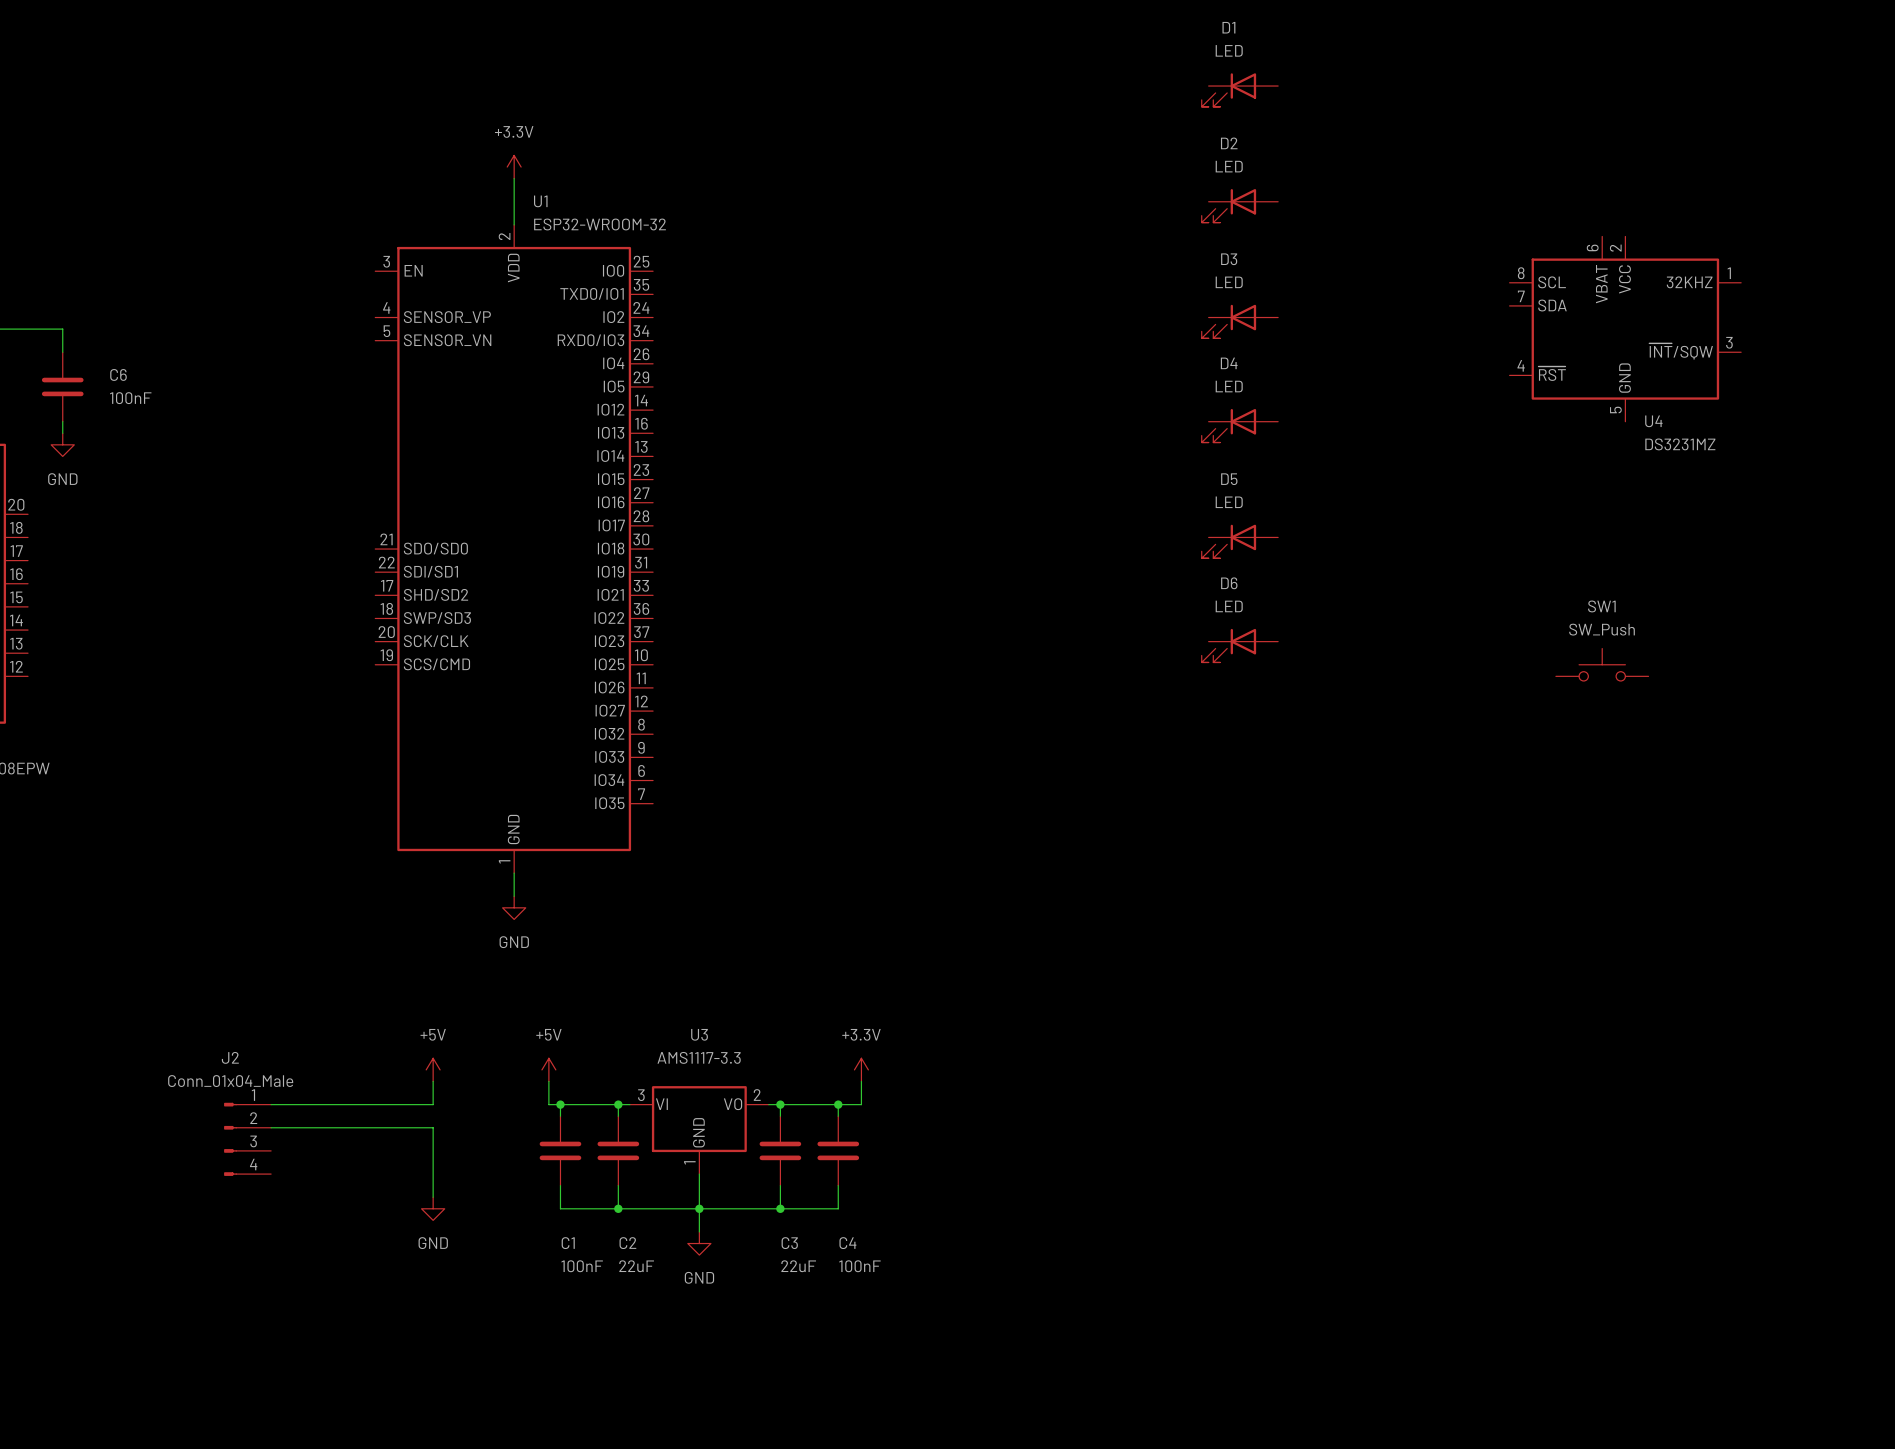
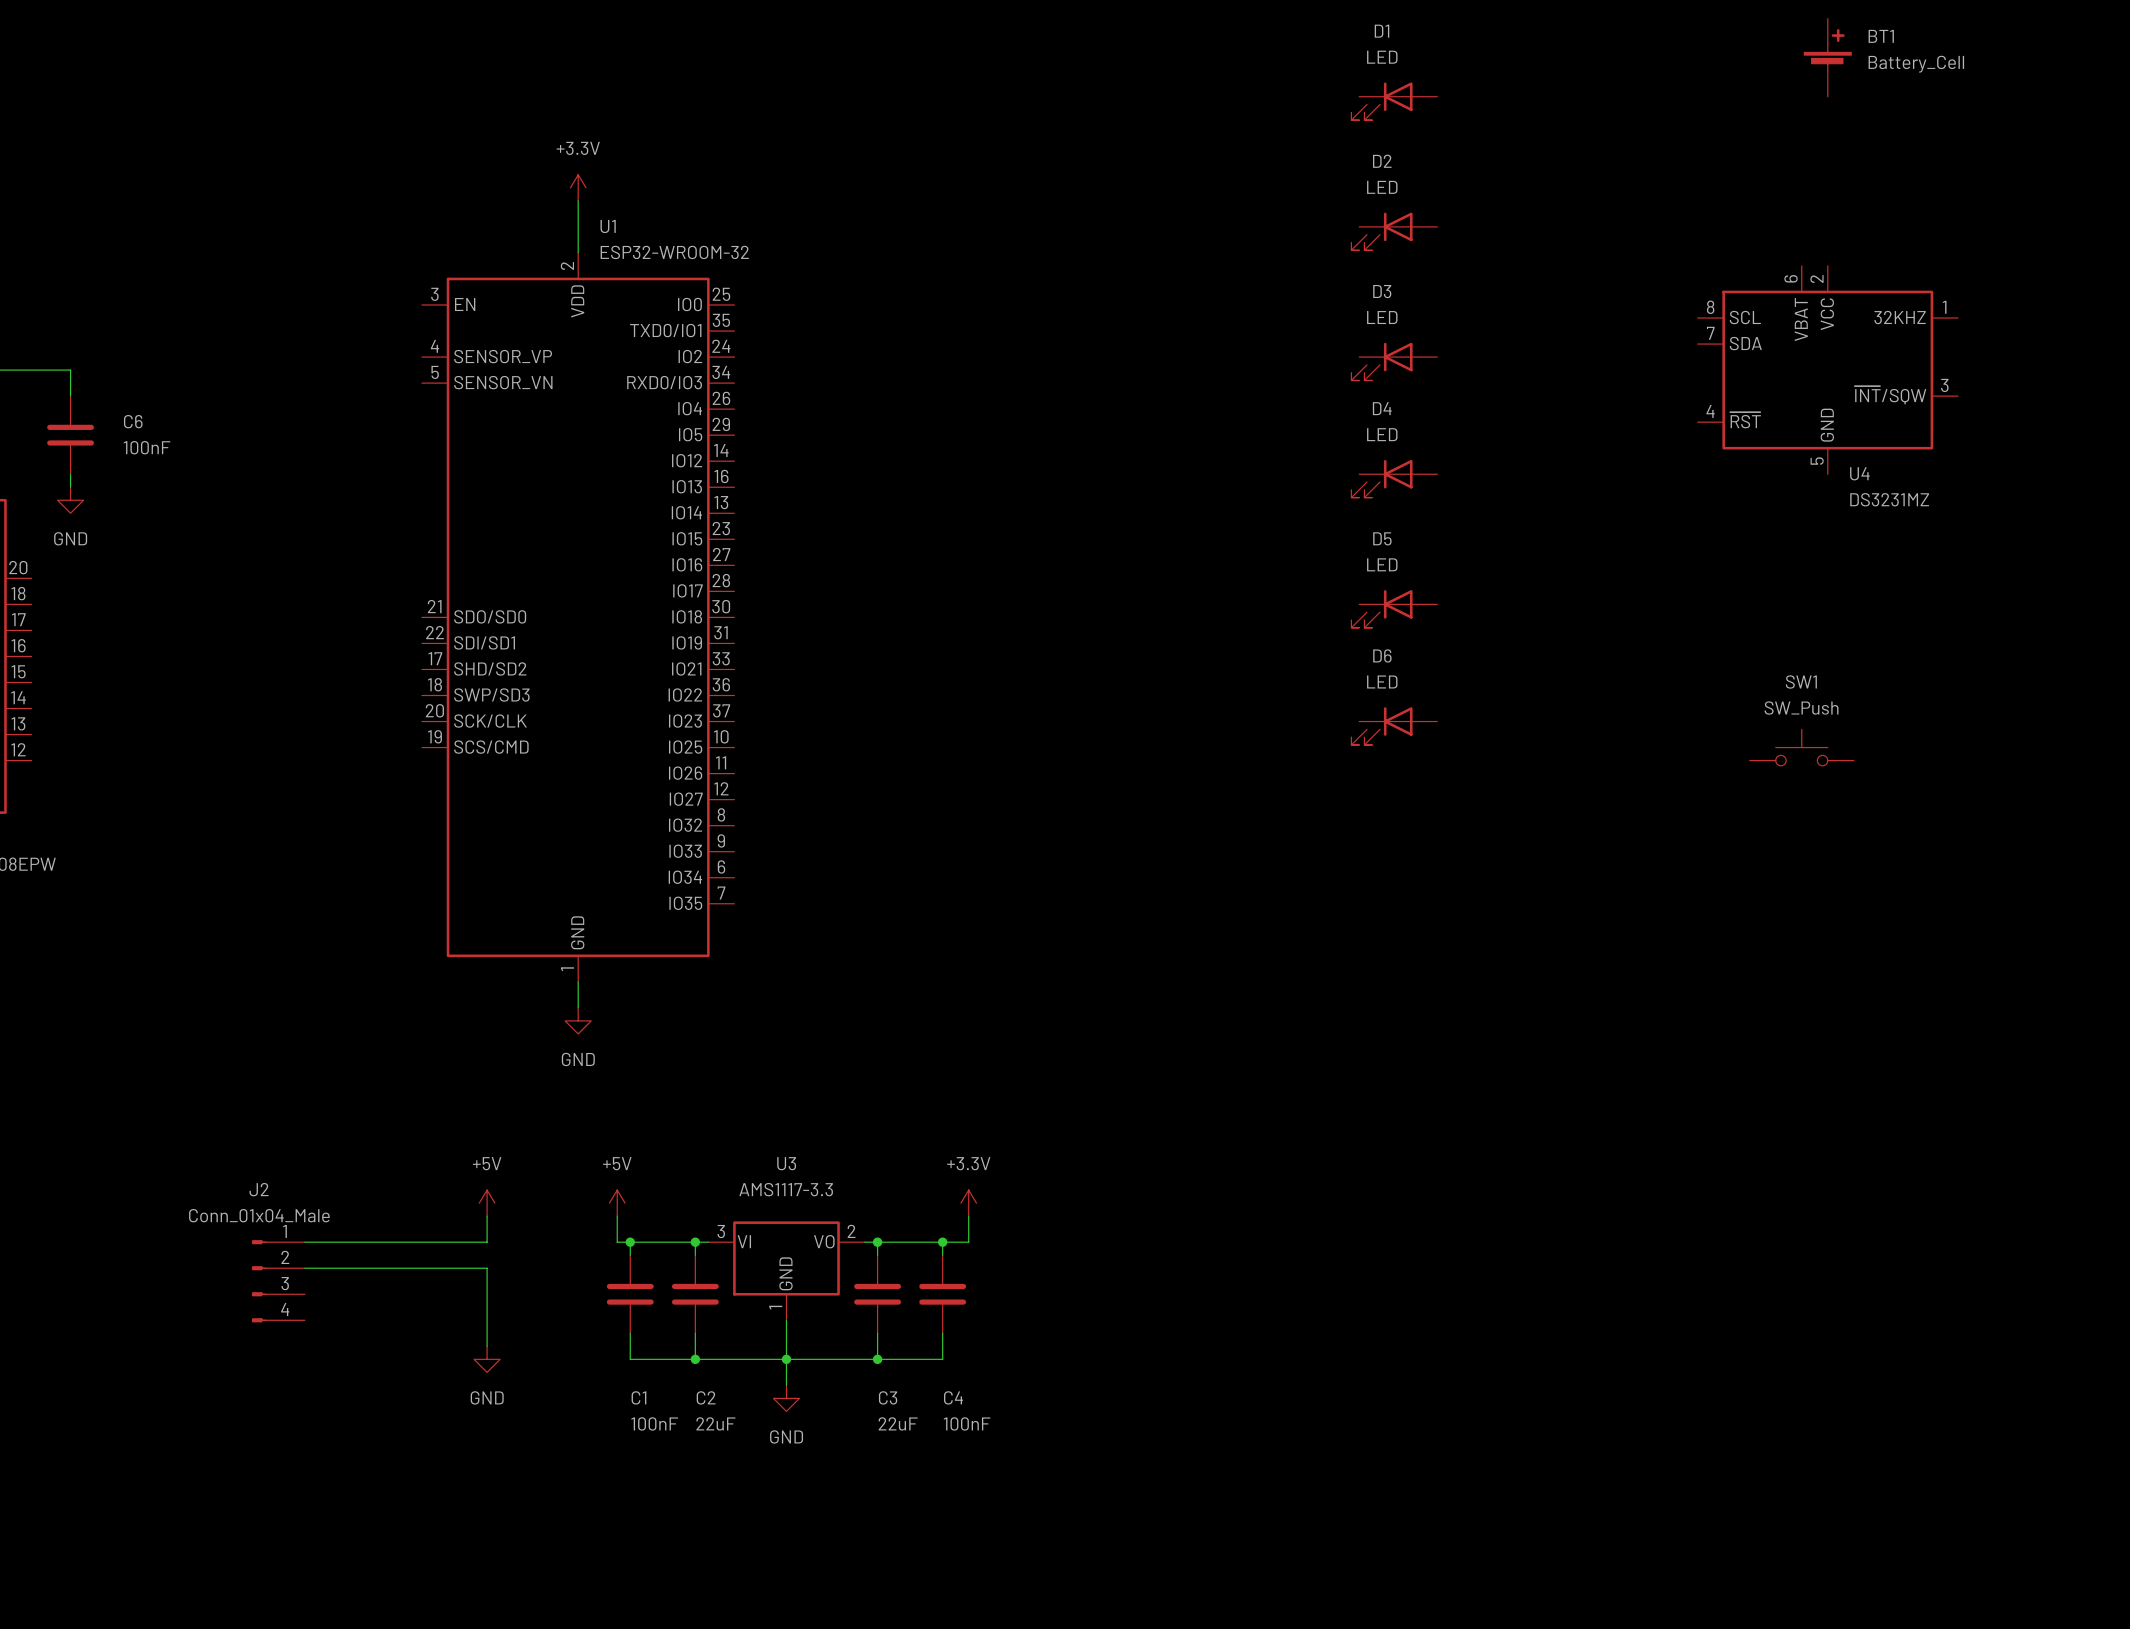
BT1: none -> Battery_Cell (1827, 57)

